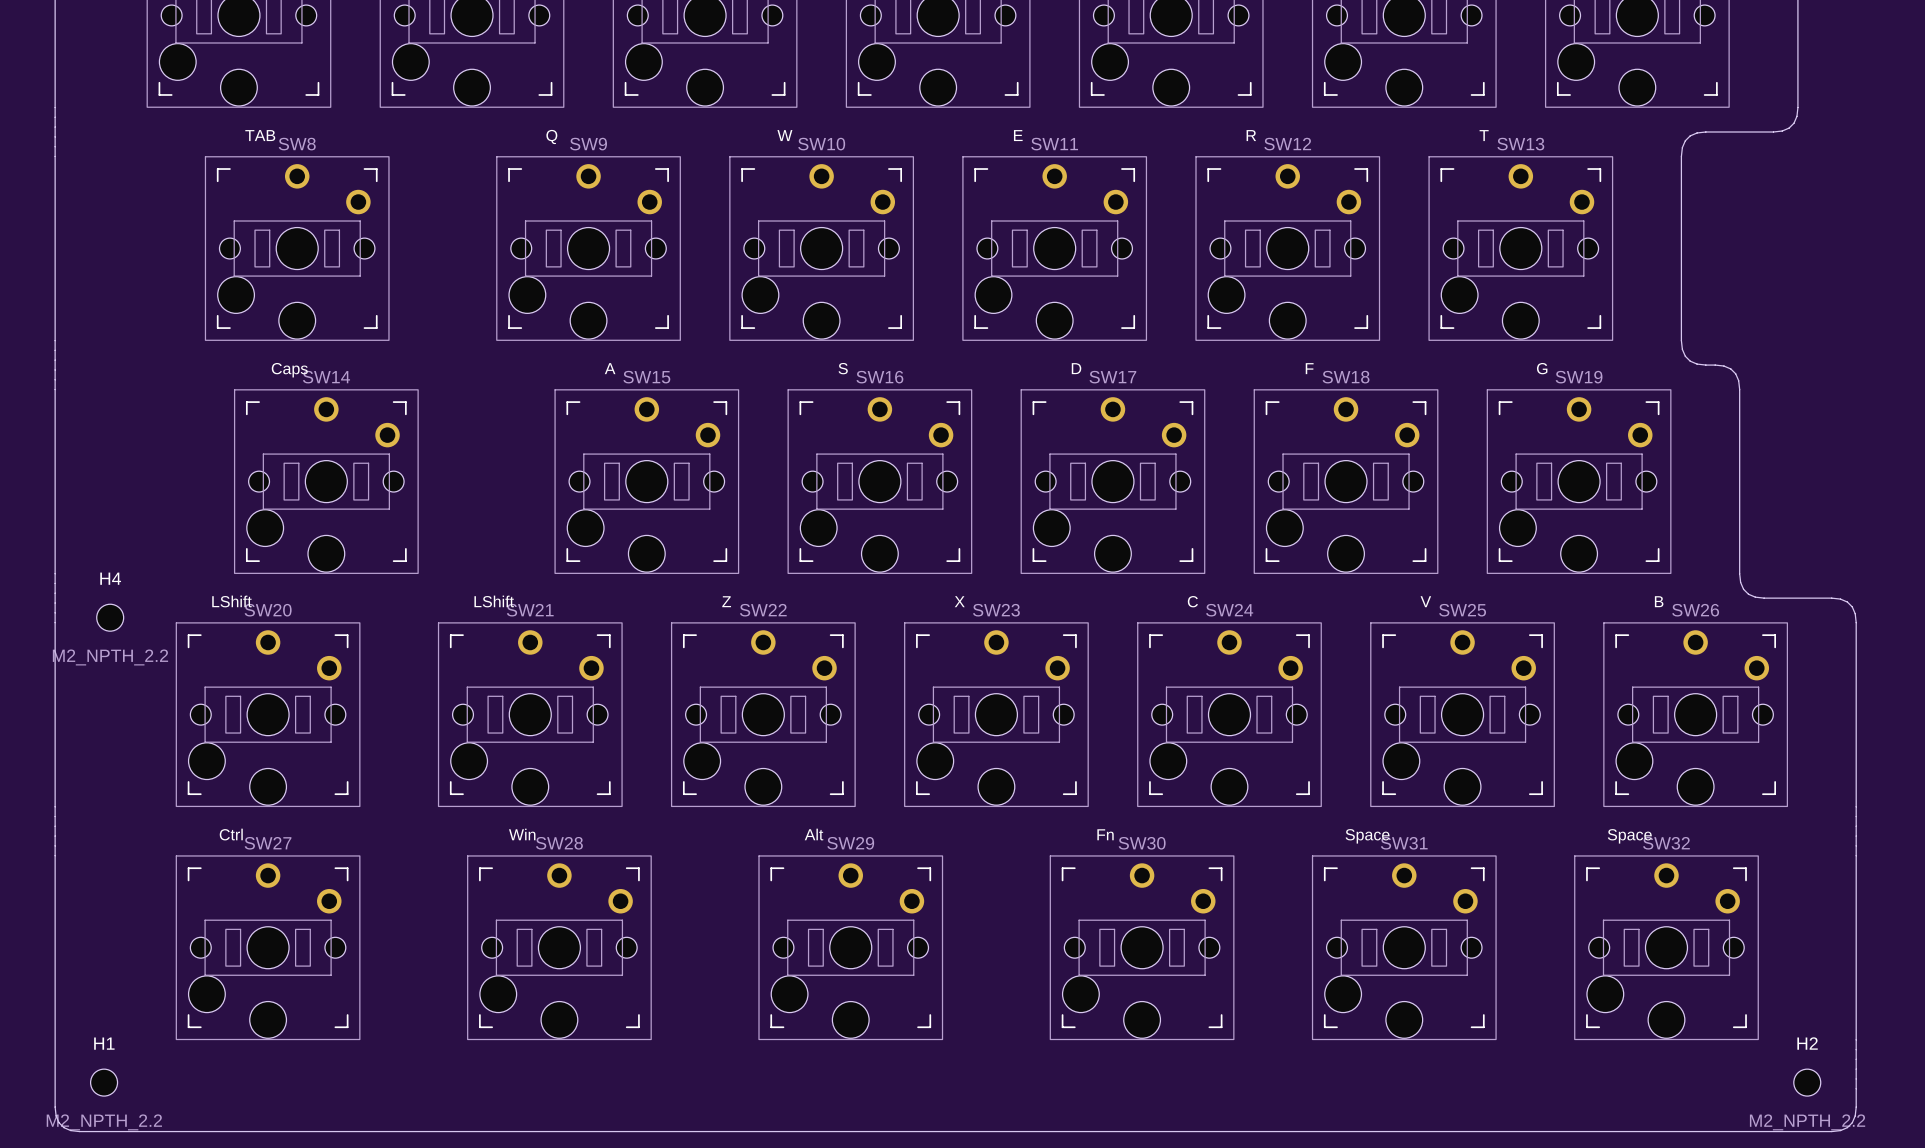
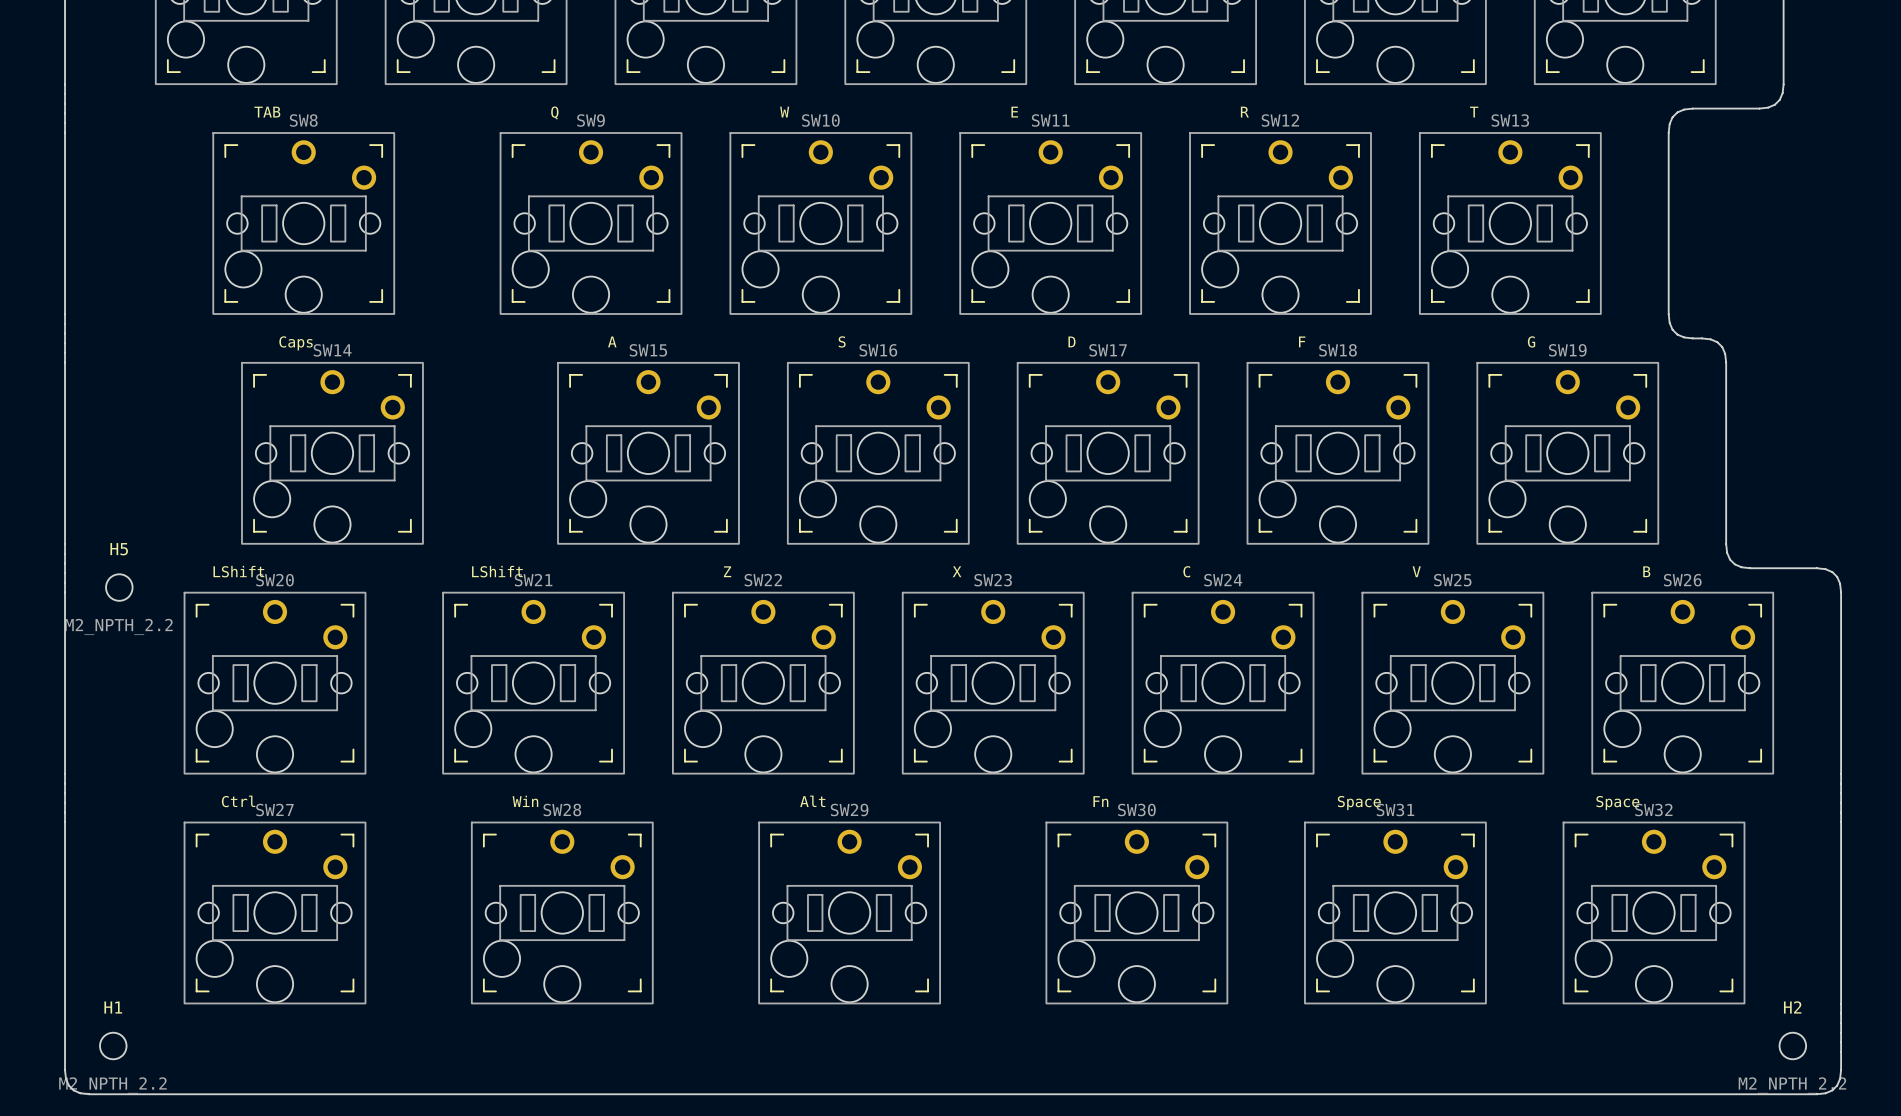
H4 name: H4 (110, 578) -> H5 (119, 549)

